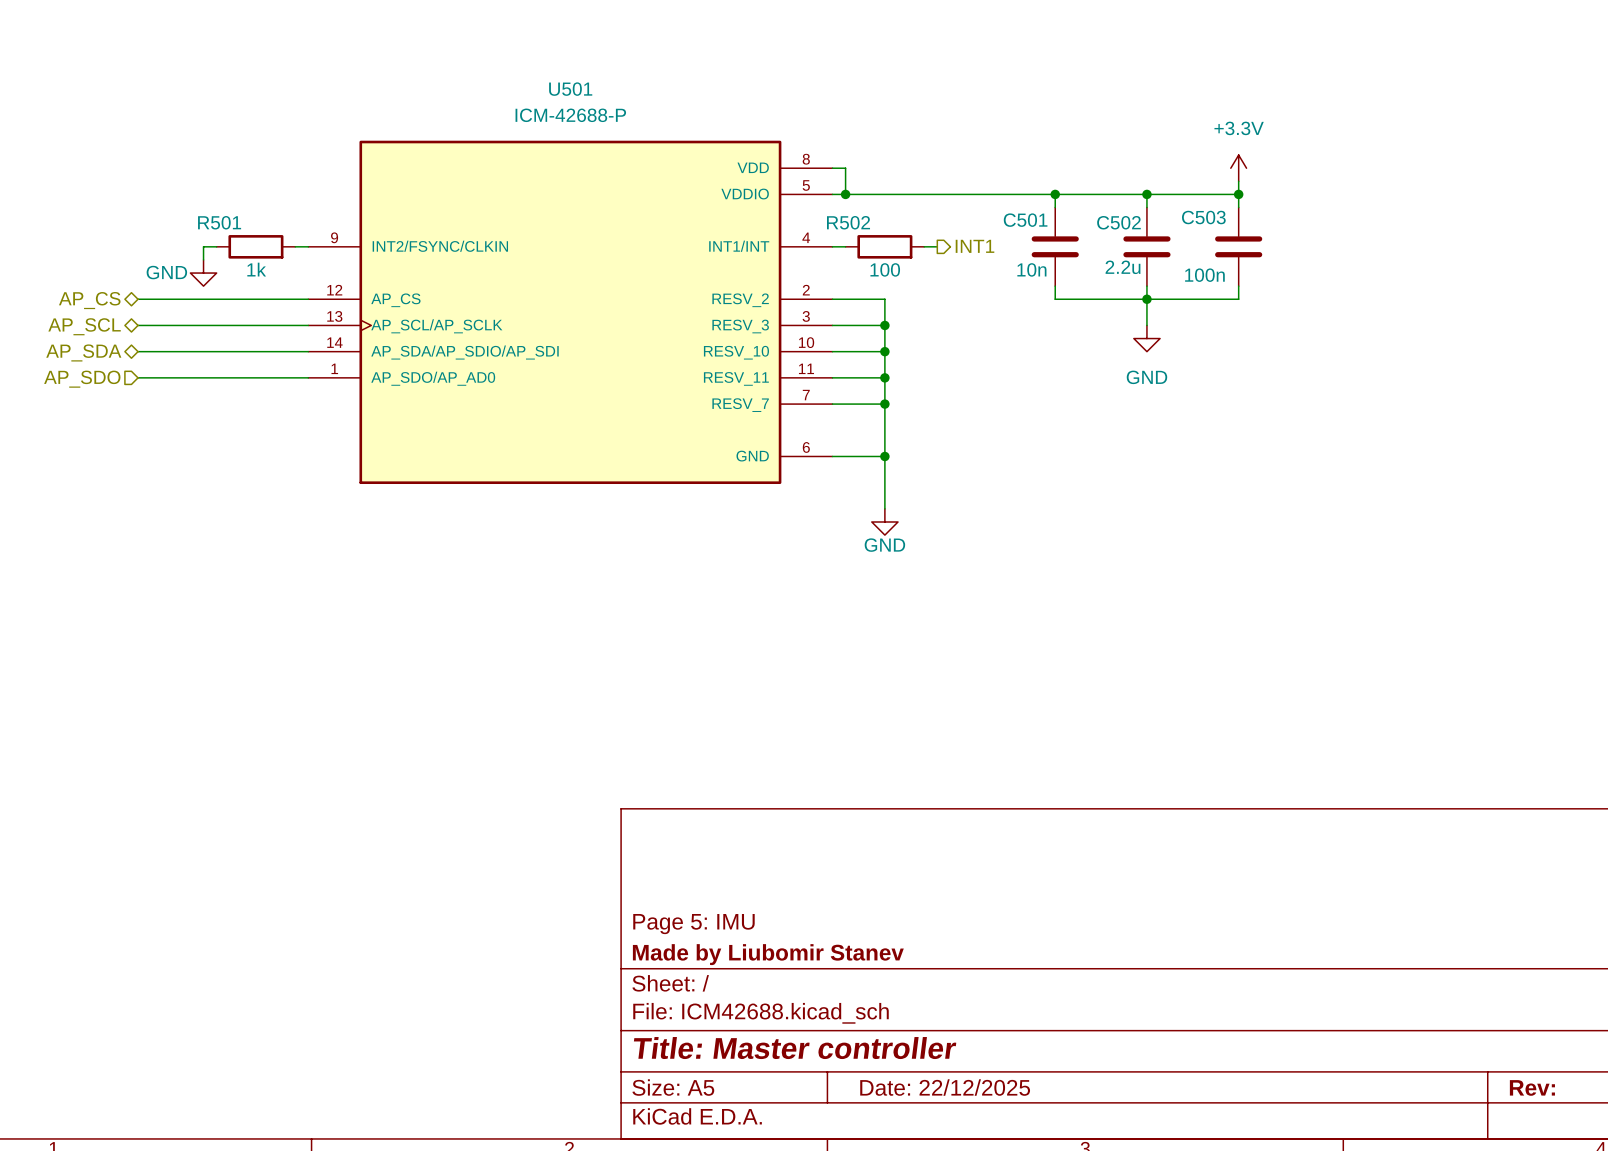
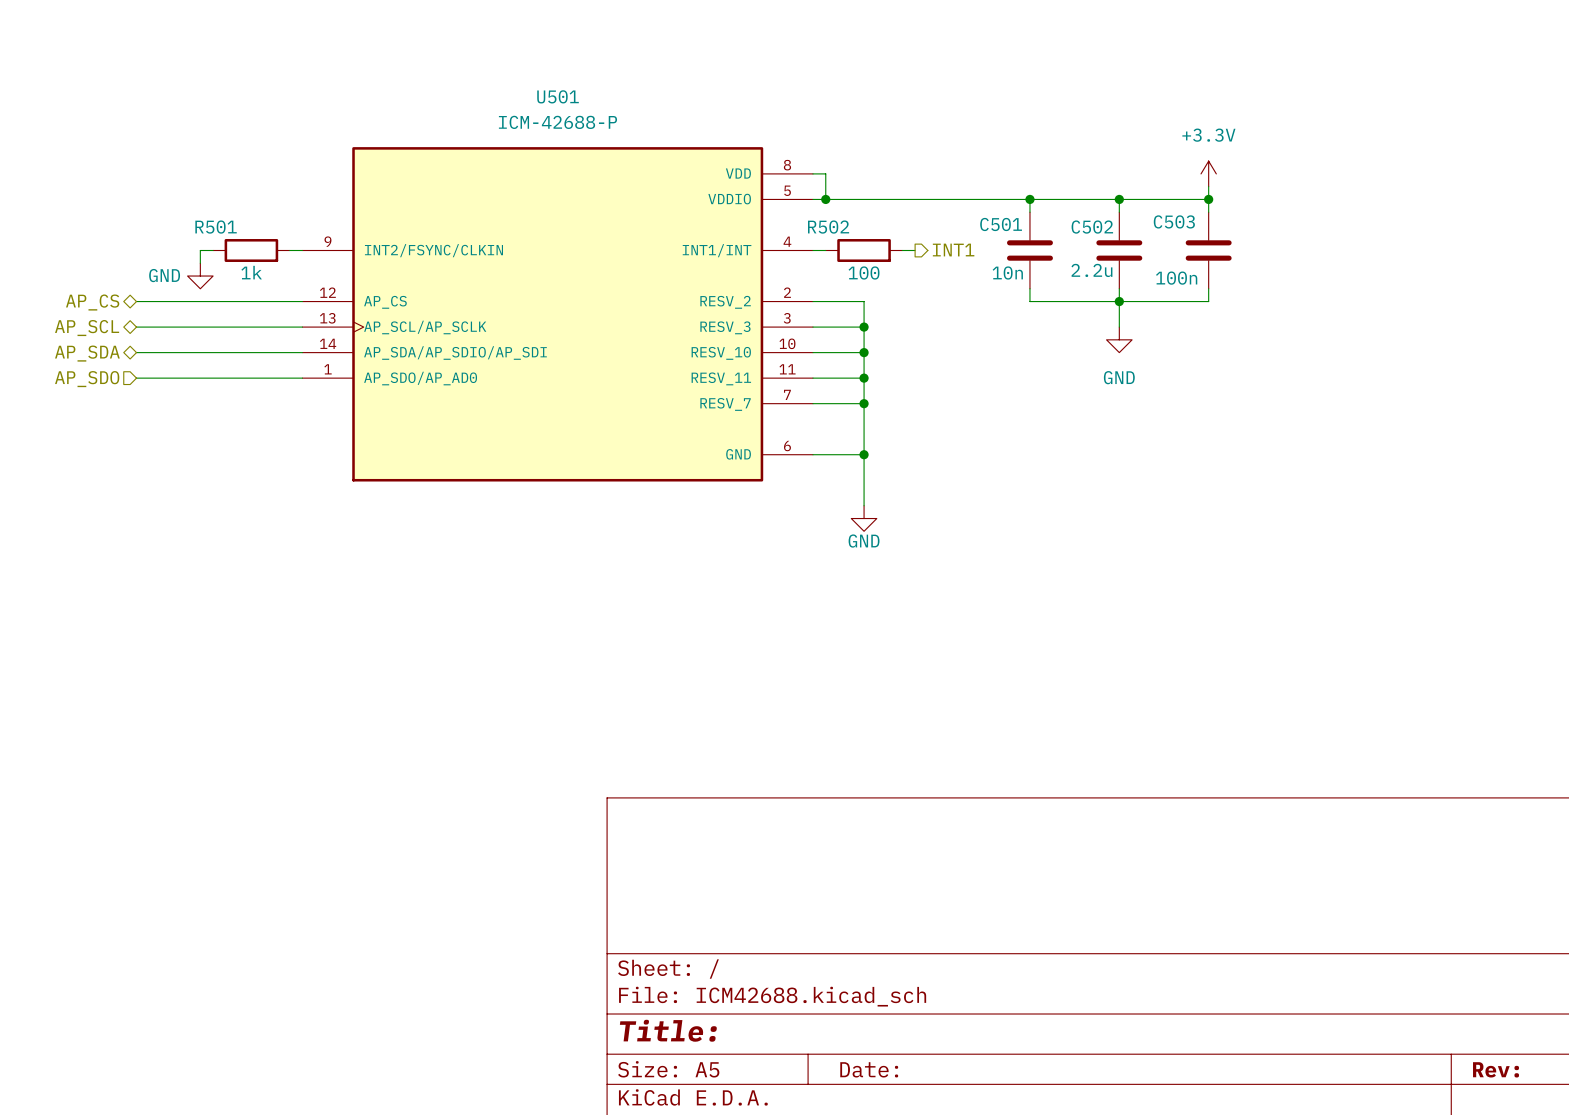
title block: Page 5: IMU (693, 924) -> none
title block: Made by Liubomir Stanev (768, 954) -> none
title block: Title: Master controller (795, 1048) -> Title: (668, 1030)
title block: Date: 22/12/2025 (945, 1087) -> Date: (869, 1069)

